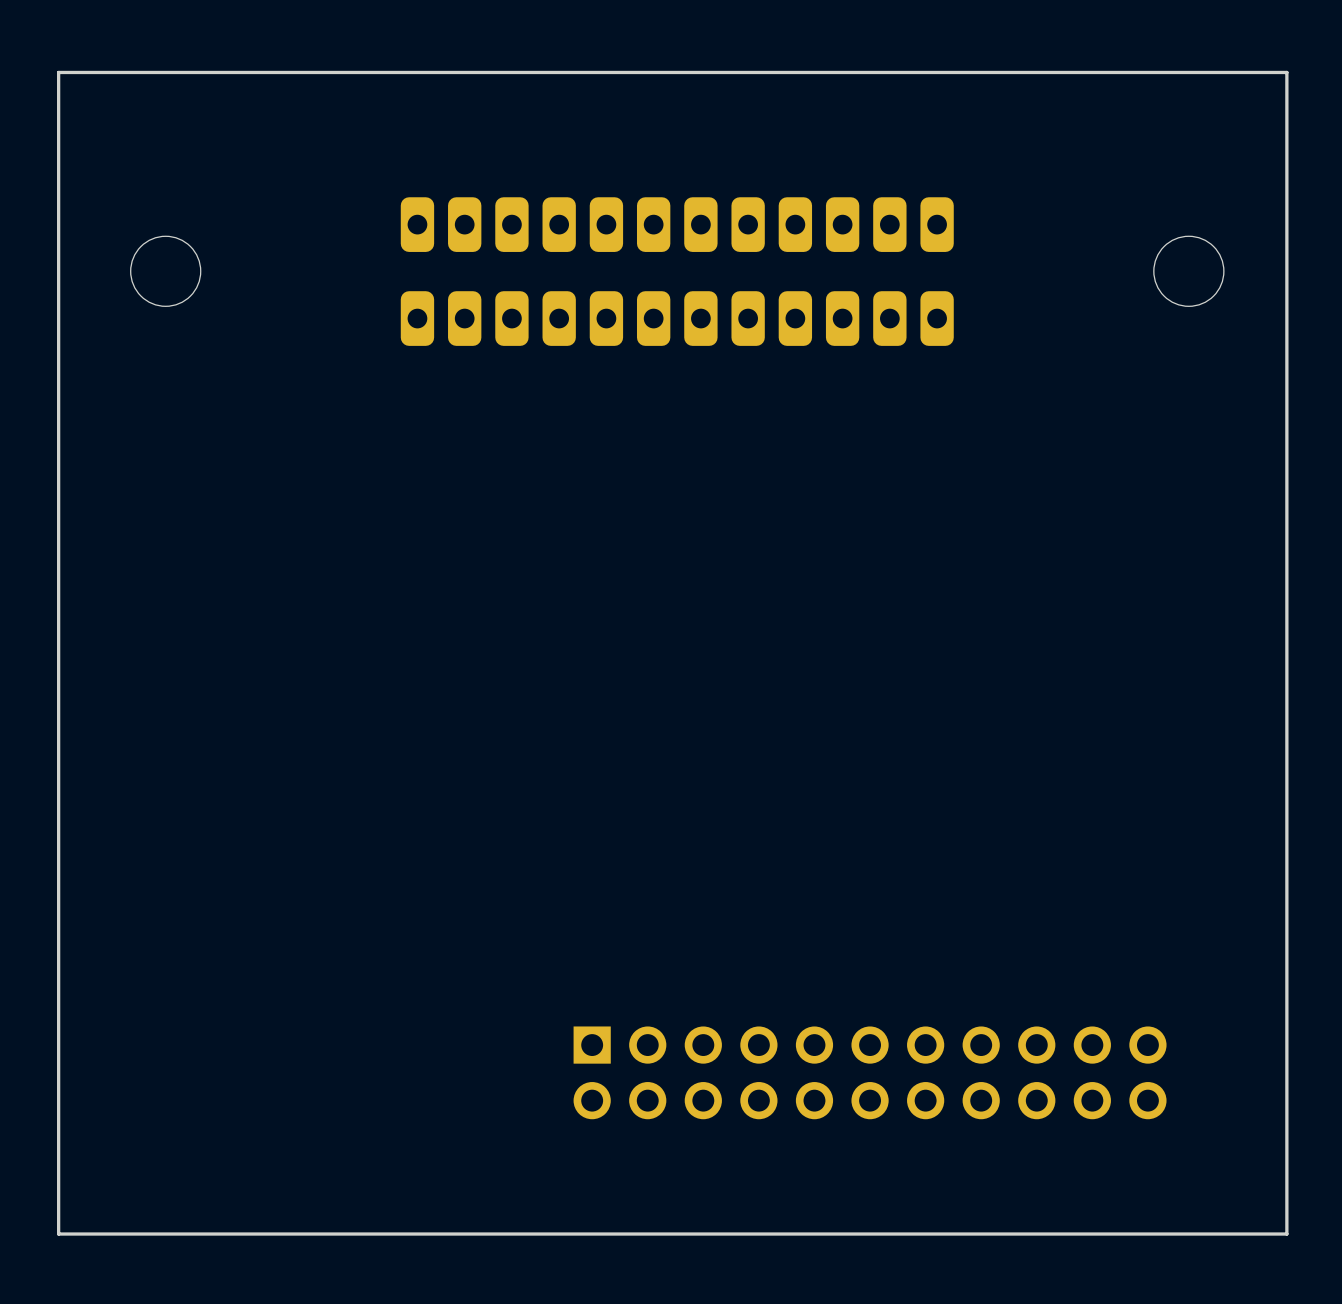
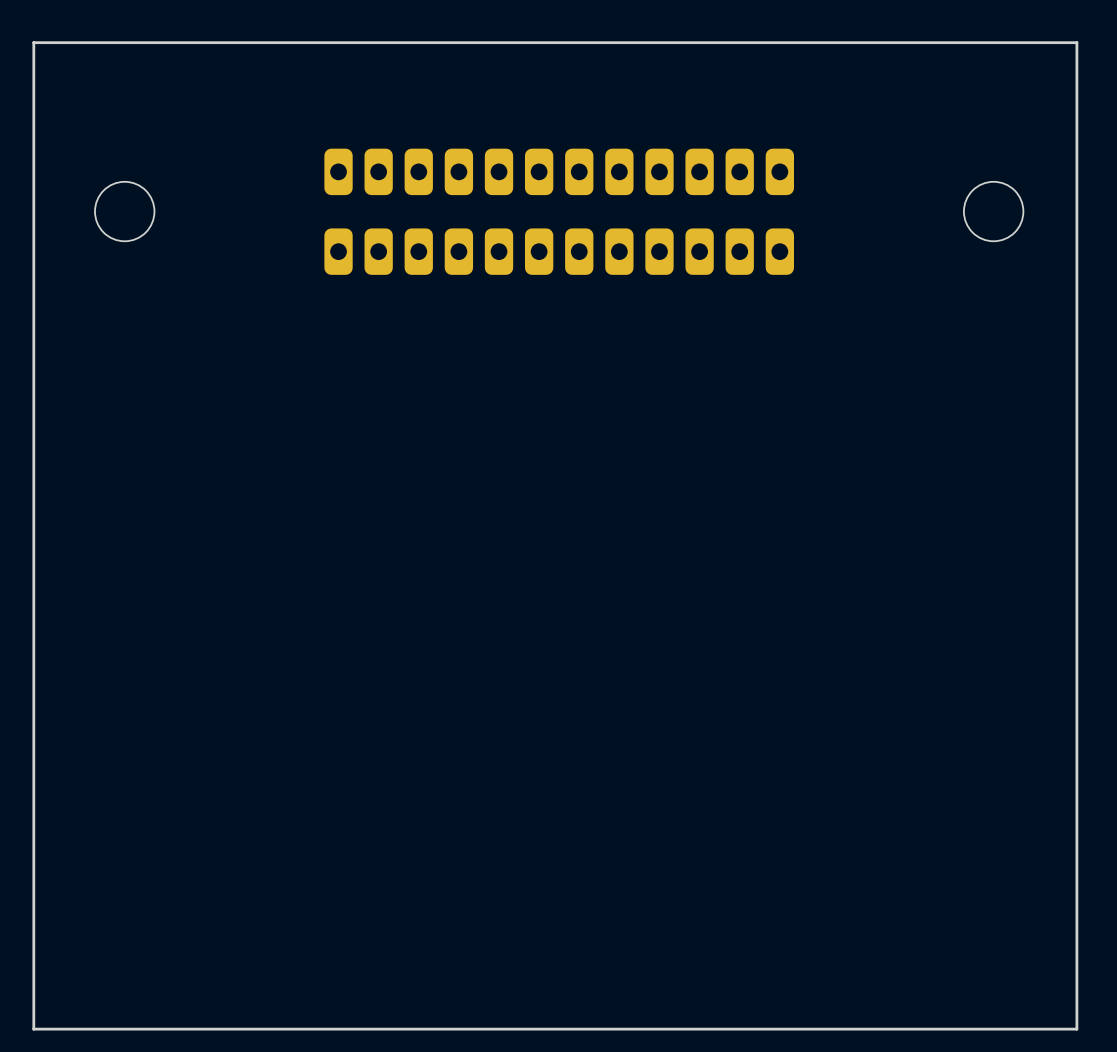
part: (870, 1072) -> none

